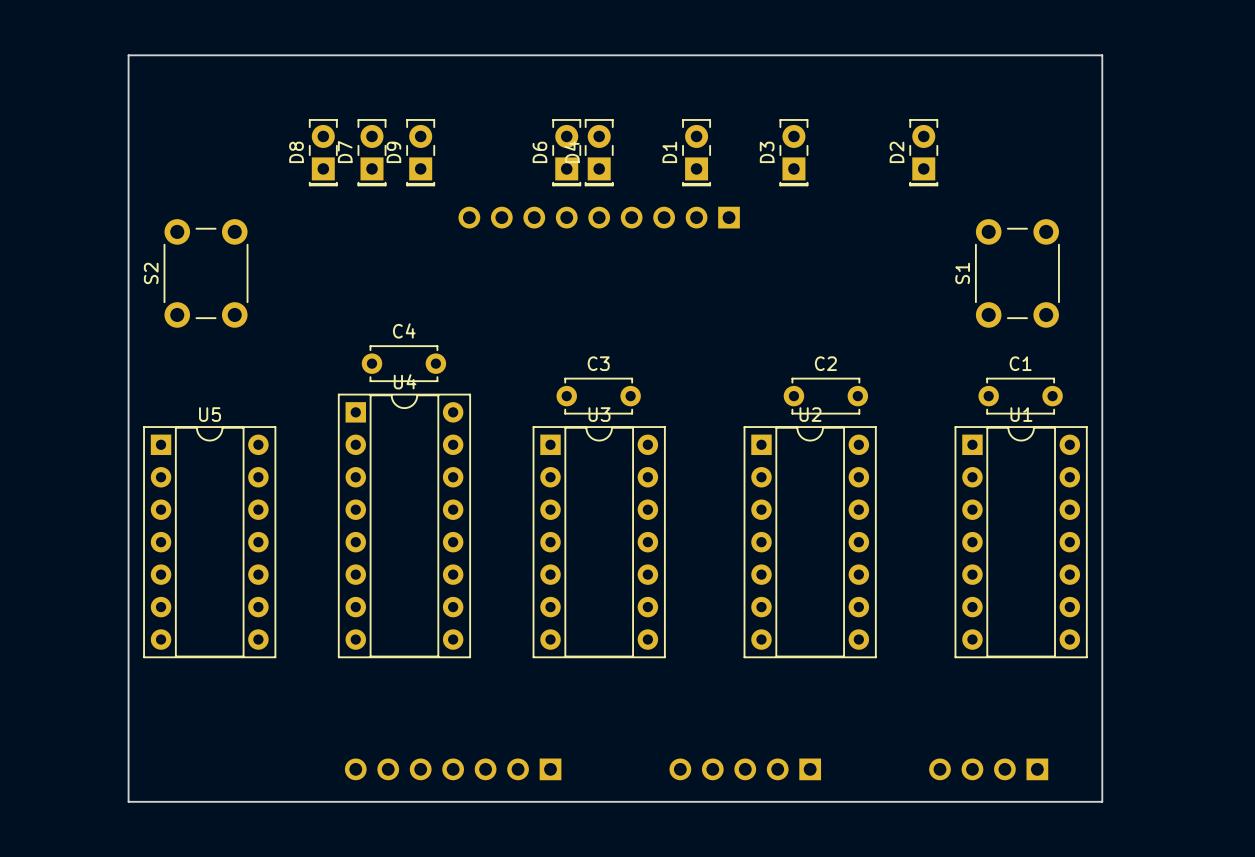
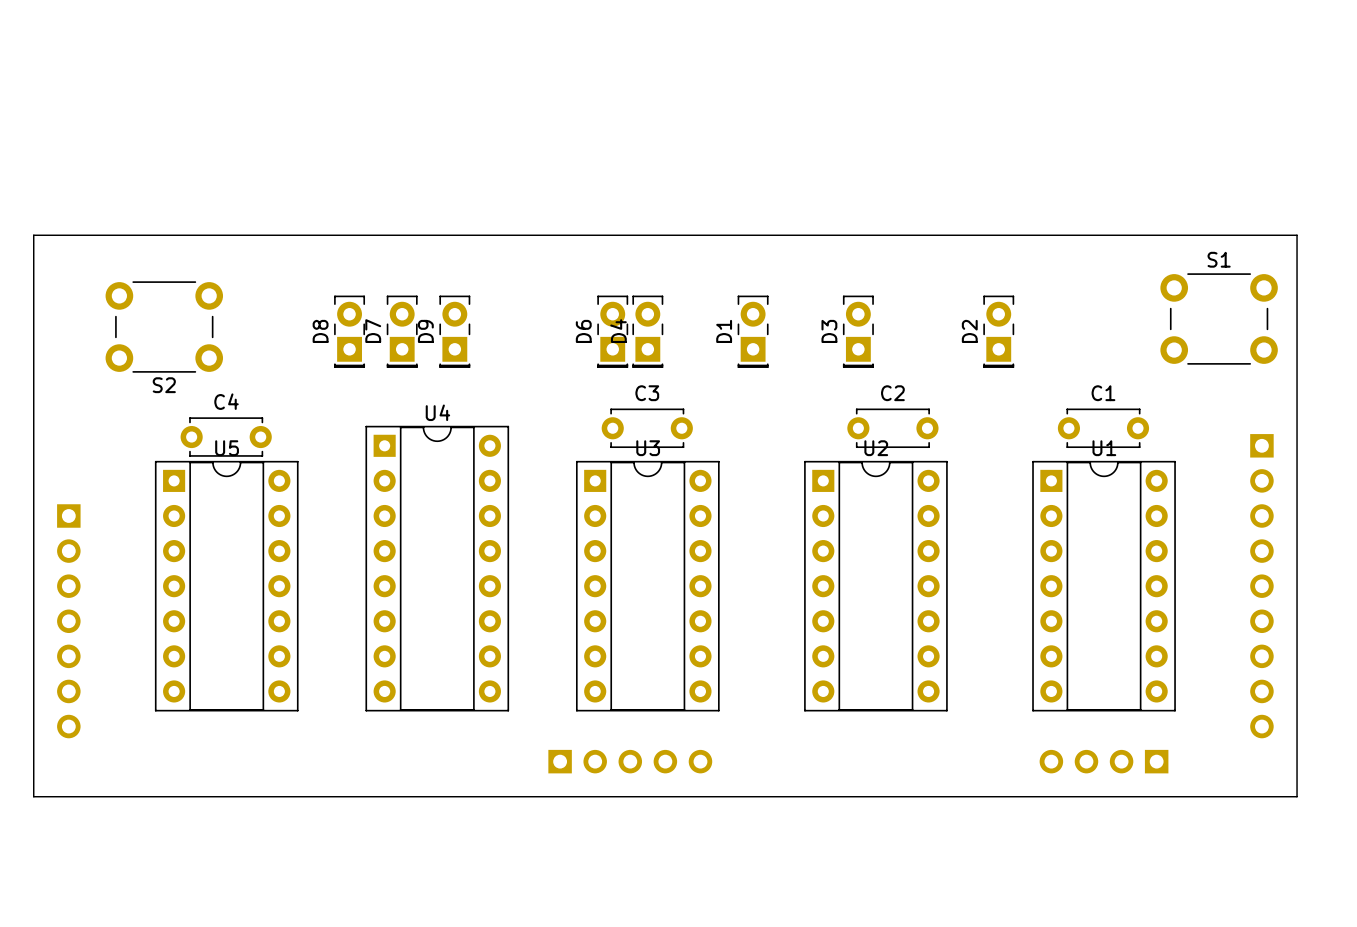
board edge: (128, 55) (128, 801) (1102, 801) (1102, 55) (128, 55) -> (33, 235) (33, 796) (1297, 796) (1297, 235) (33, 235)
D8 position: (323, 152) -> (349, 331)
D7 position: (372, 152) -> (402, 331)
D9 position: (420, 152) -> (454, 331)
D6 position: (566, 152) -> (612, 331)
D4 position: (599, 152) -> (647, 331)
D1 position: (696, 152) -> (753, 331)
D3 position: (793, 152) -> (858, 331)
D2 position: (923, 152) -> (998, 331)
part: (599, 217) -> none
S2 name position: S2 (151, 273) -> S2 (164, 385)
S2 rotation: 0° (206, 273) -> 90° clockwise (164, 326)
S1 rotation: 0° (1017, 273) -> 90° clockwise (1219, 318)
S1 position: (1017, 273) -> (1219, 318)
C4 position: (403, 363) -> (226, 437)
part: none -> (1261, 586)
part: none -> (68, 621)
part: (453, 769) -> none
part rotation: 0° (745, 769) -> 180° (630, 761)
part position: (745, 769) -> (630, 761)
part position: (988, 769) -> (1104, 761)

